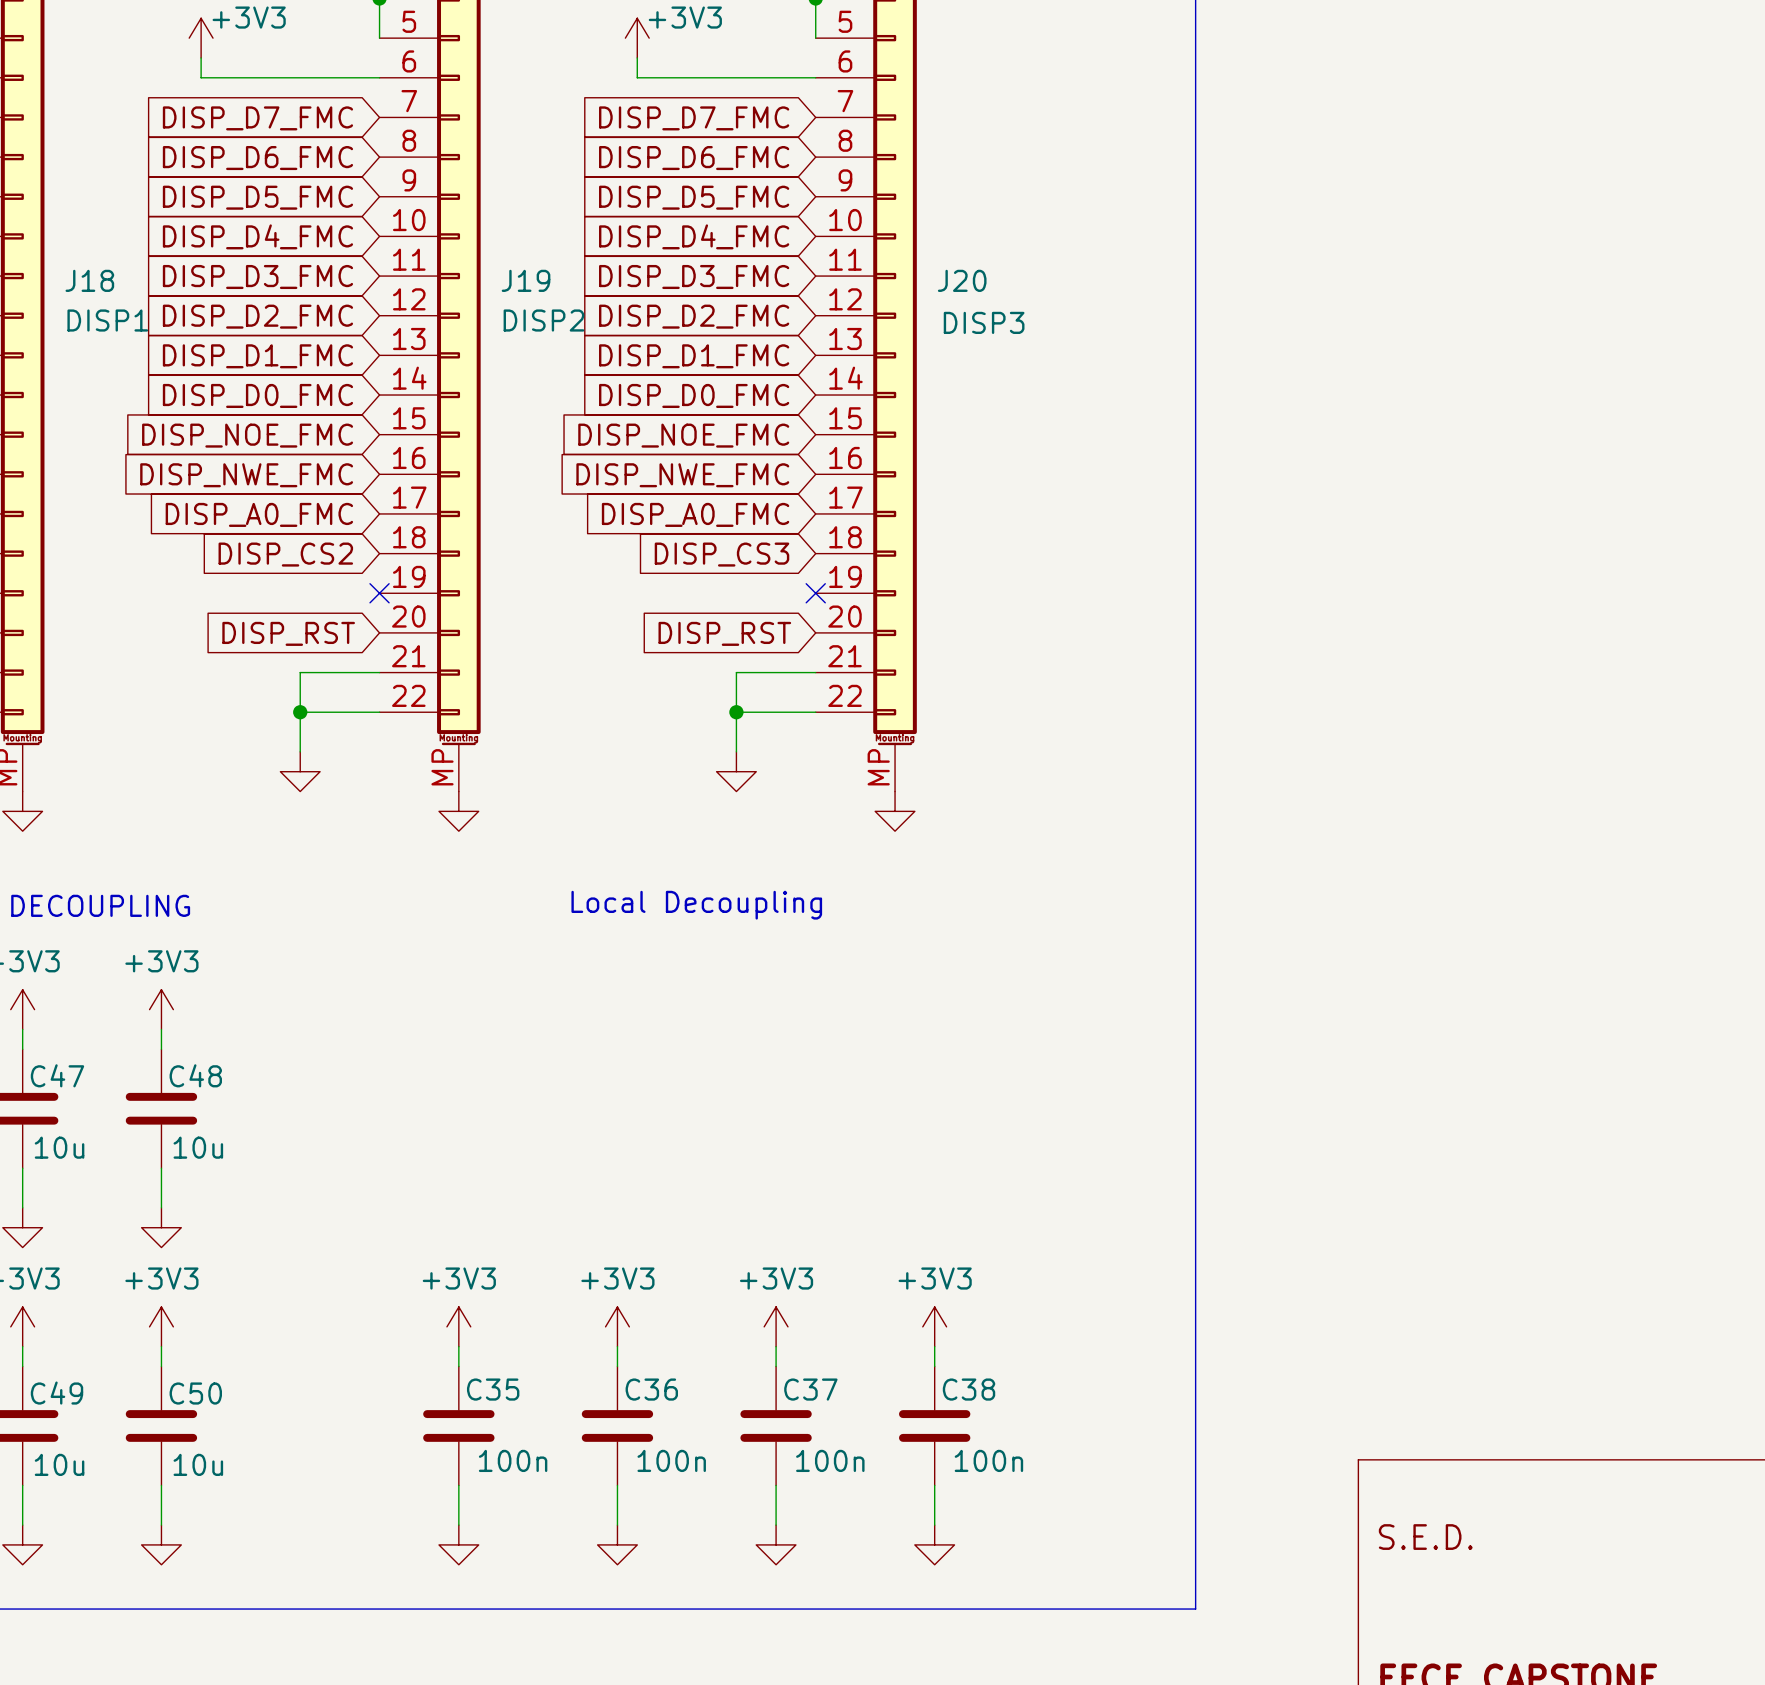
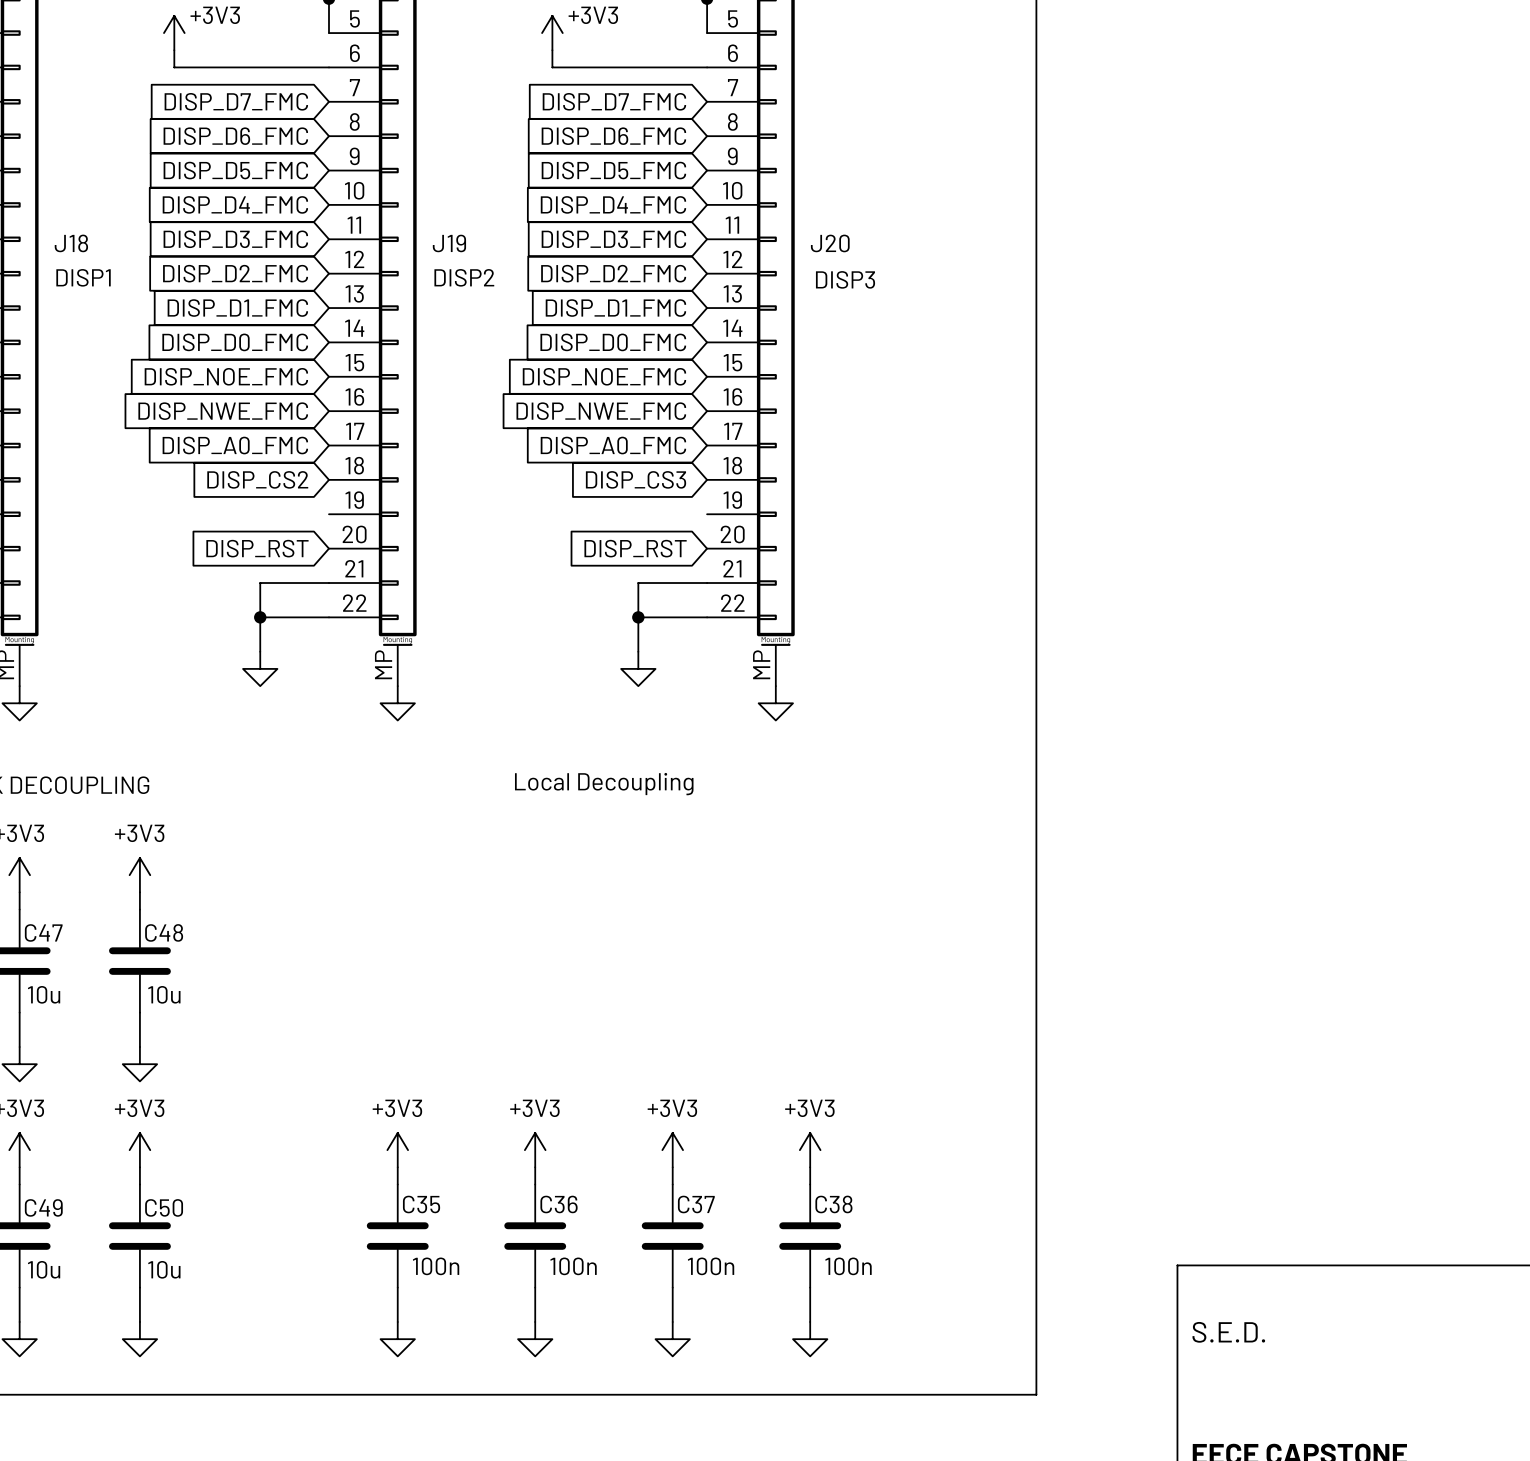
no-connect mark: (379, 593) -> none
no-connect mark: (815, 593) -> none

